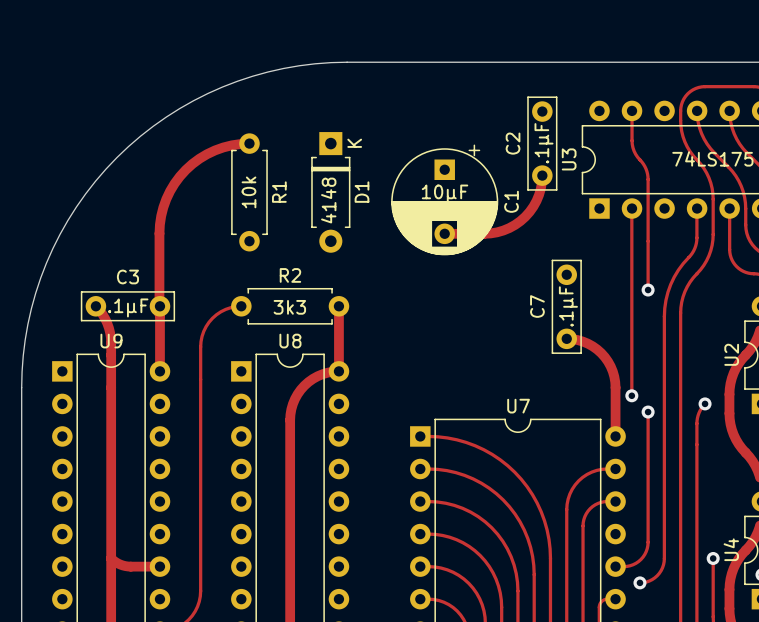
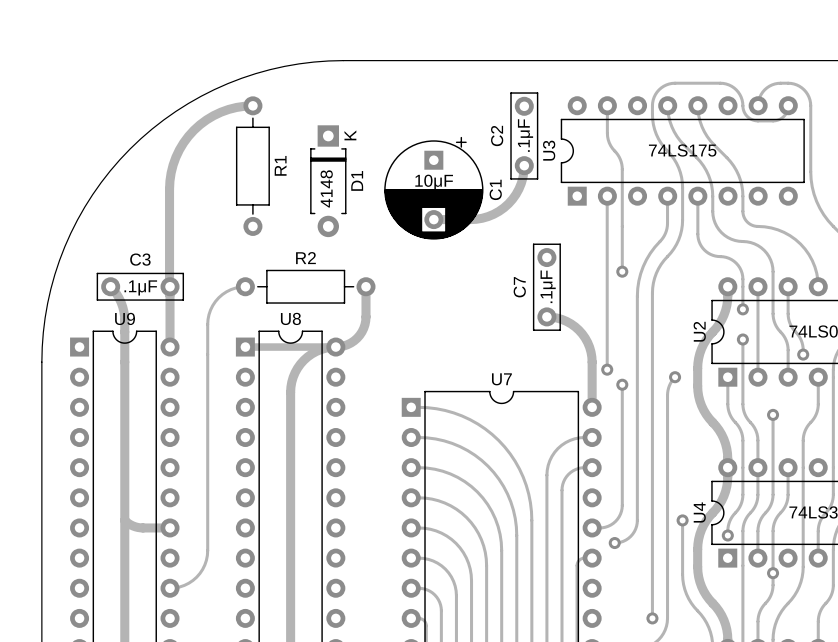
R1 footprint: [231, 133, 268, 252] -> [235, 96, 270, 236]
track: (249, 143) (231, 145) (215, 150) (199, 158) (185, 169) (174, 183) (166, 199) (161, 216) (159, 233) -> (252, 105) (236, 107) (213, 115) (200, 124) (183, 142) (175, 157) (171, 172) (169, 219)
R1 value: 10k (248, 192) -> none
R2 footprint: [231, 287, 350, 325] -> [235, 269, 376, 304]
track: (338, 306) (338, 371) -> none
track: none -> (366, 286) (364, 324) (359, 335) (350, 343) (335, 347) (245, 347)
R2 value: 3k3 (289, 307) -> none

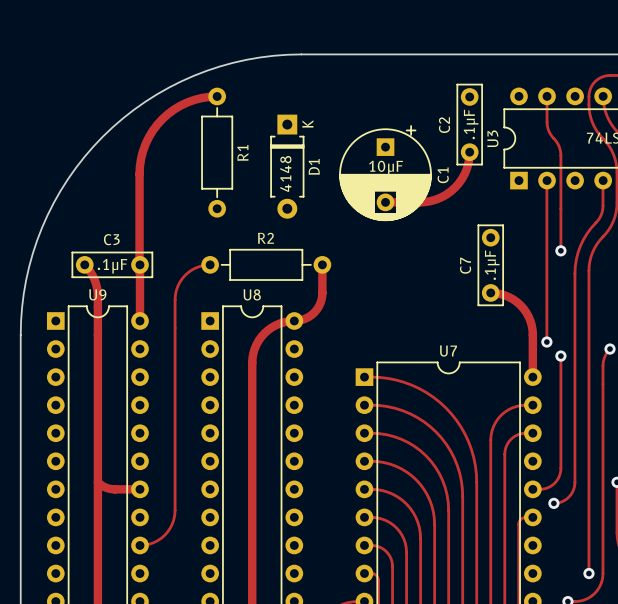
track: (245, 347) (335, 347) -> none

